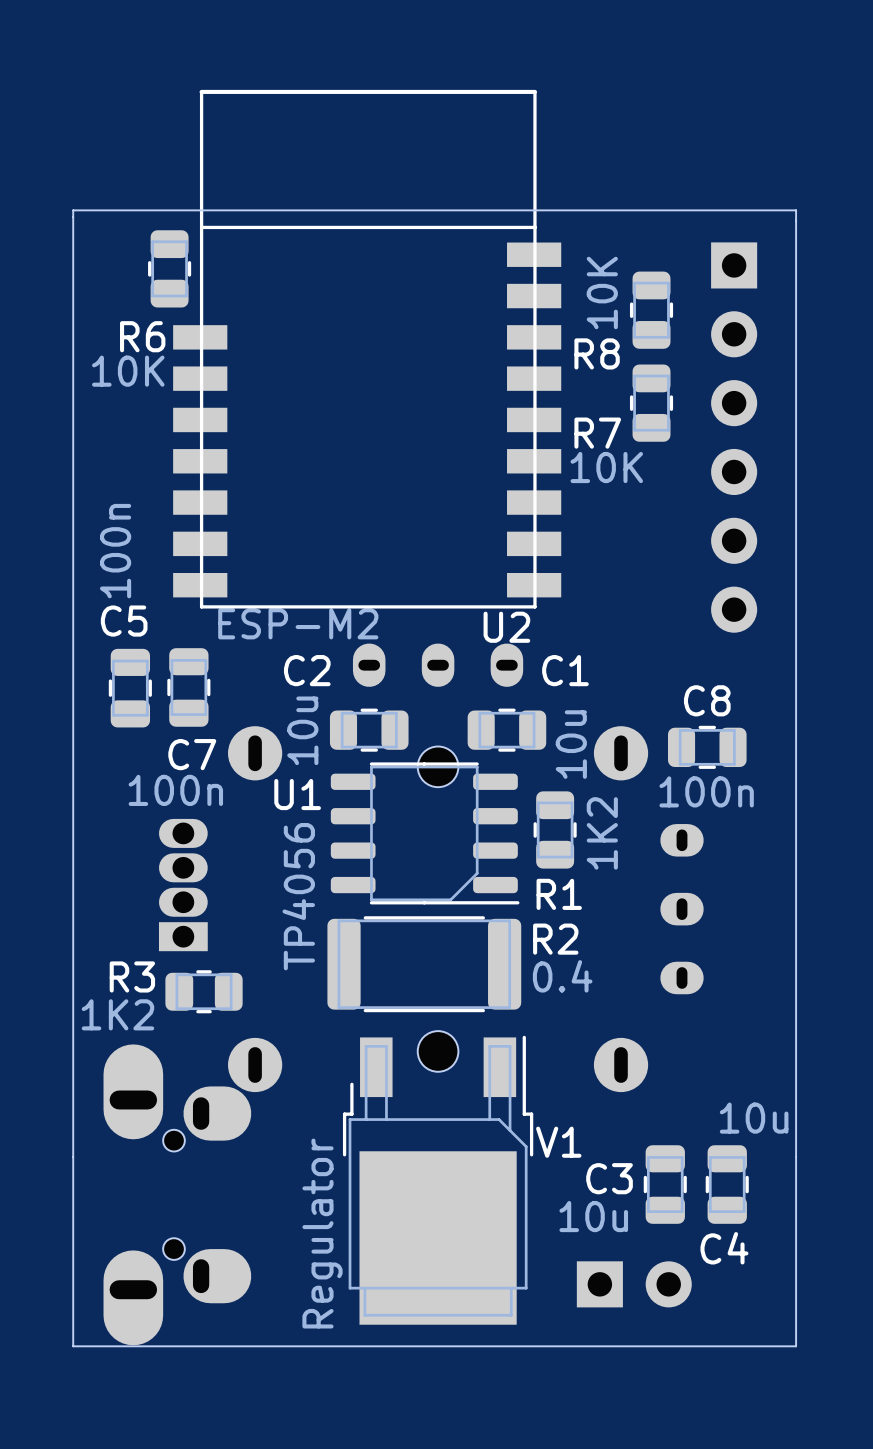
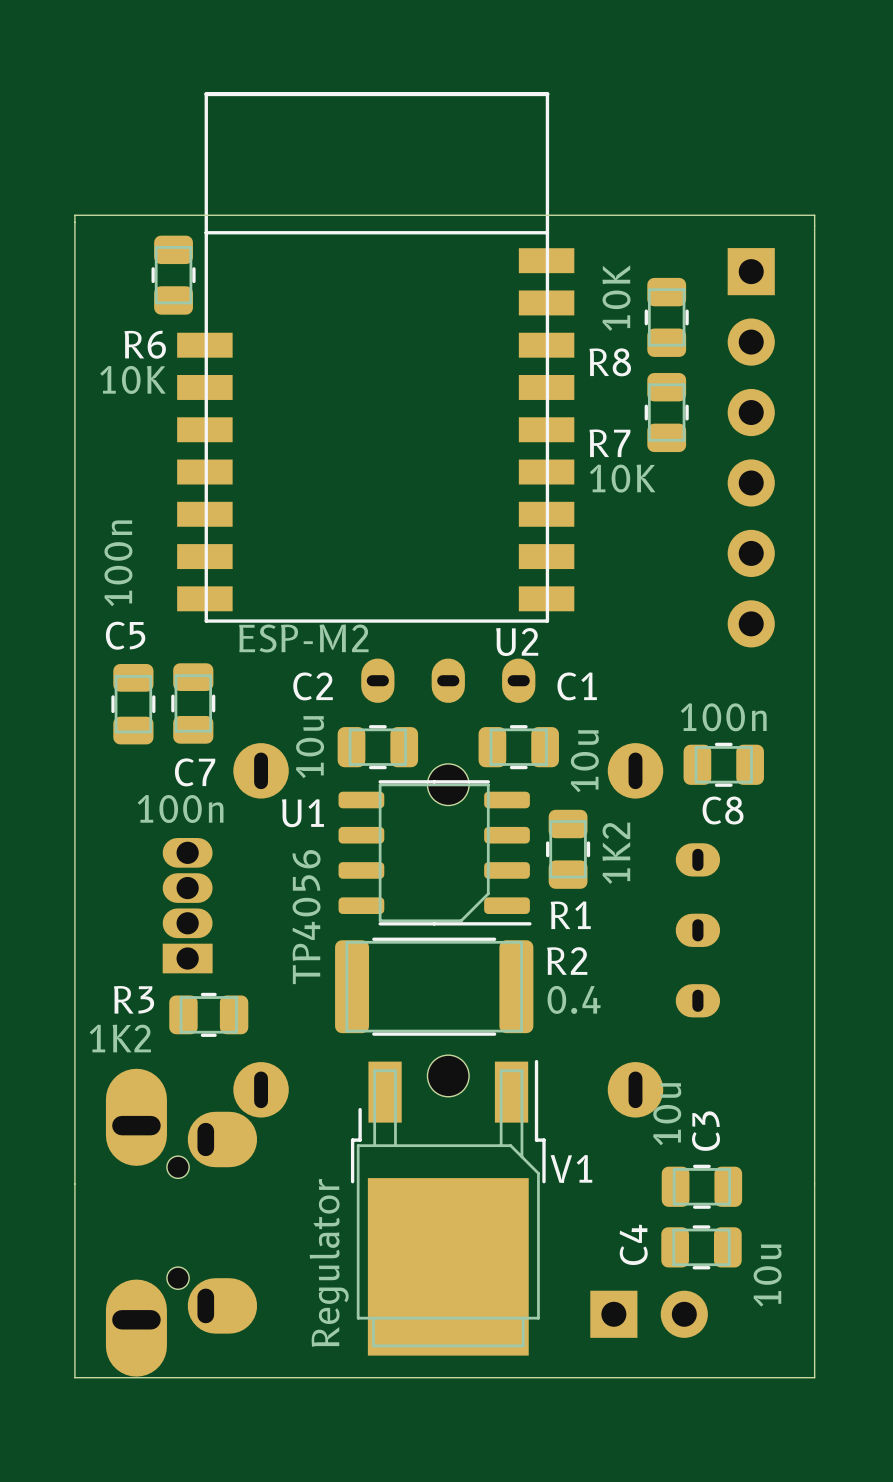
C8 name position: C8 (707, 700) -> C8 (723, 810)
C8 value position: 100n (706, 791) -> 100n (723, 717)
C3 rotation: 0° (665, 1184) -> 90° clockwise (701, 1186)
C4 rotation: 0° (727, 1184) -> 90° clockwise (701, 1247)
C4 position: (727, 1184) -> (701, 1247)

